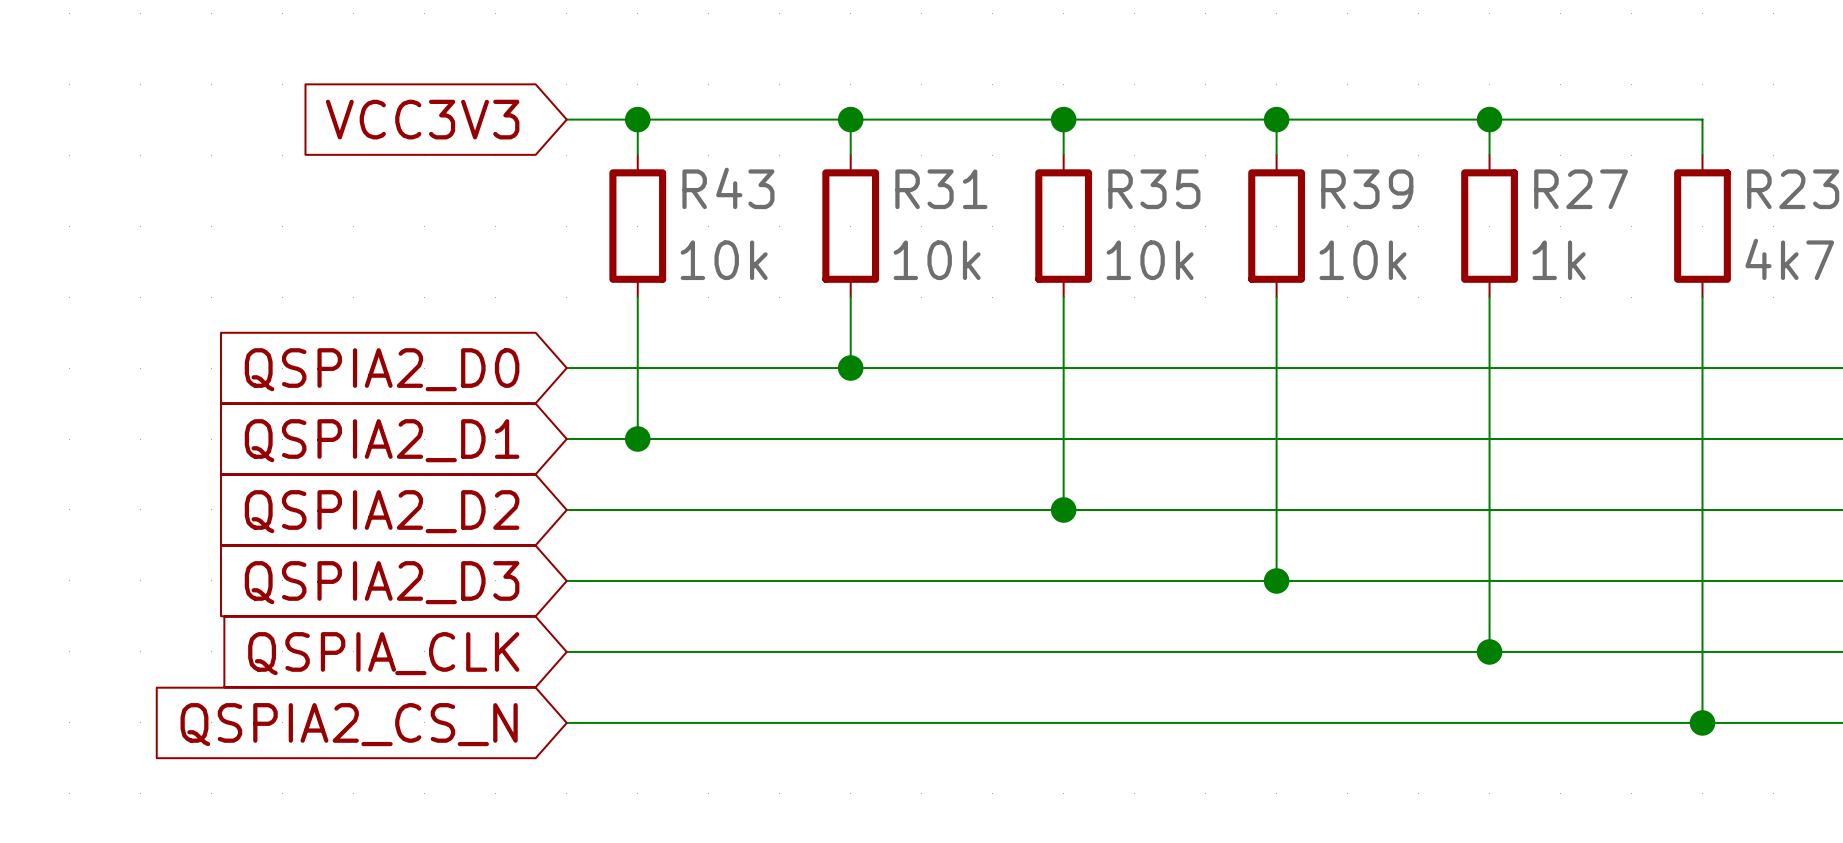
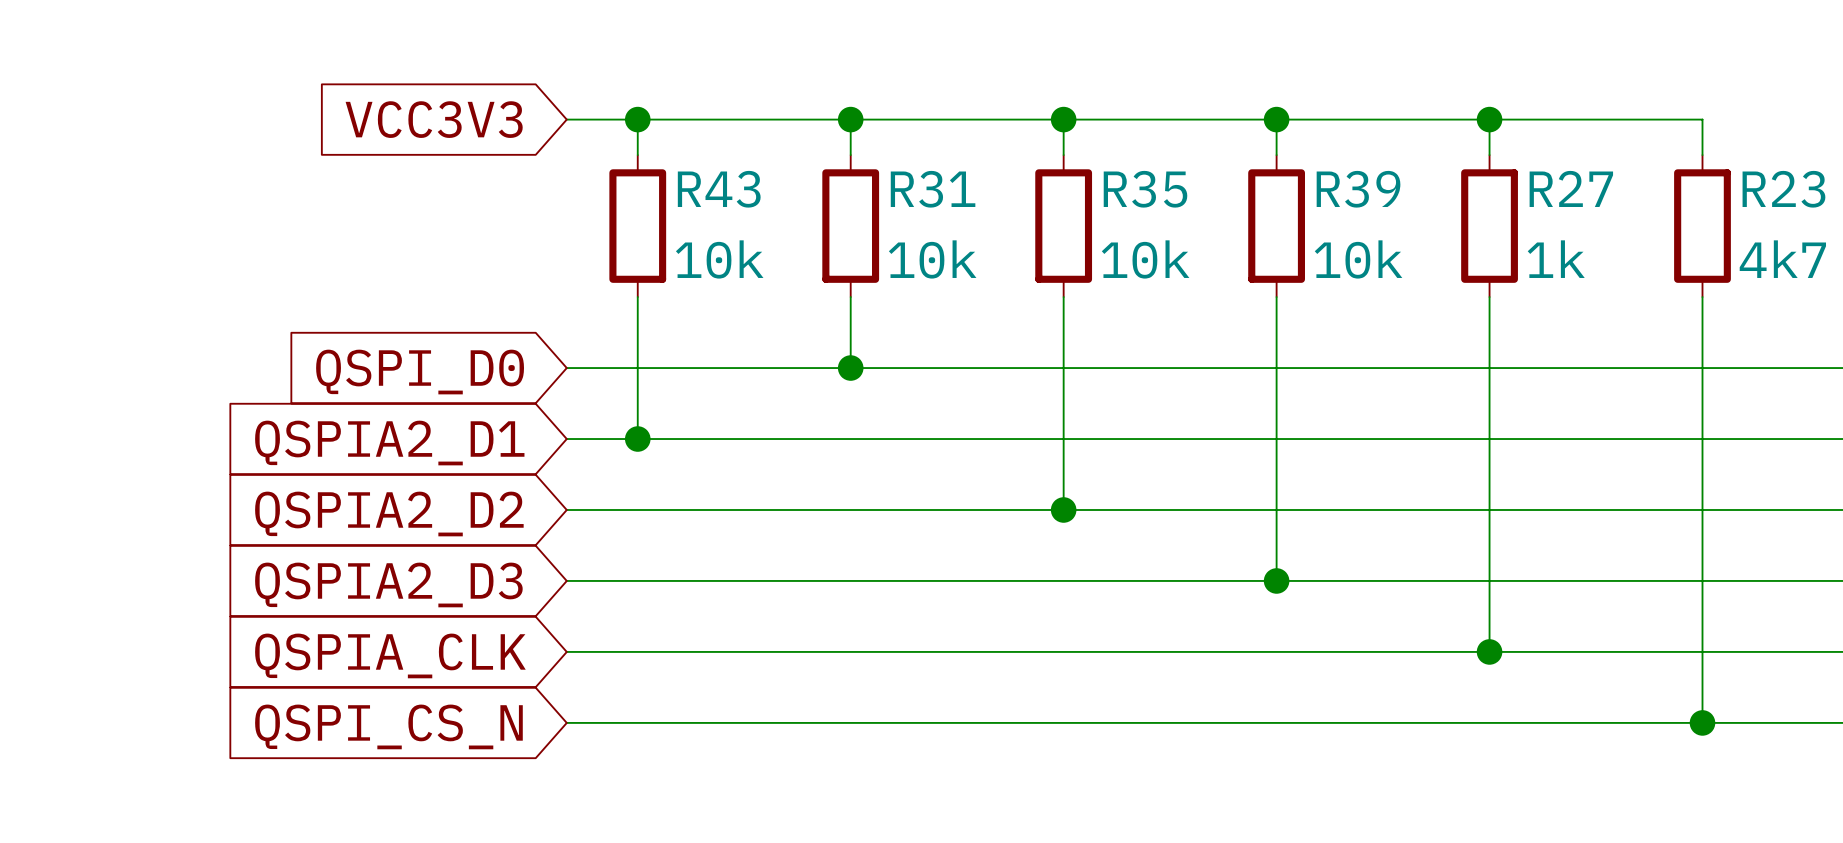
global label: QSPIA2_D0 (382, 369) -> QSPI_D0 (420, 372)
global label: QSPIA2_CS_N (349, 724) -> QSPI_CS_N (388, 726)

